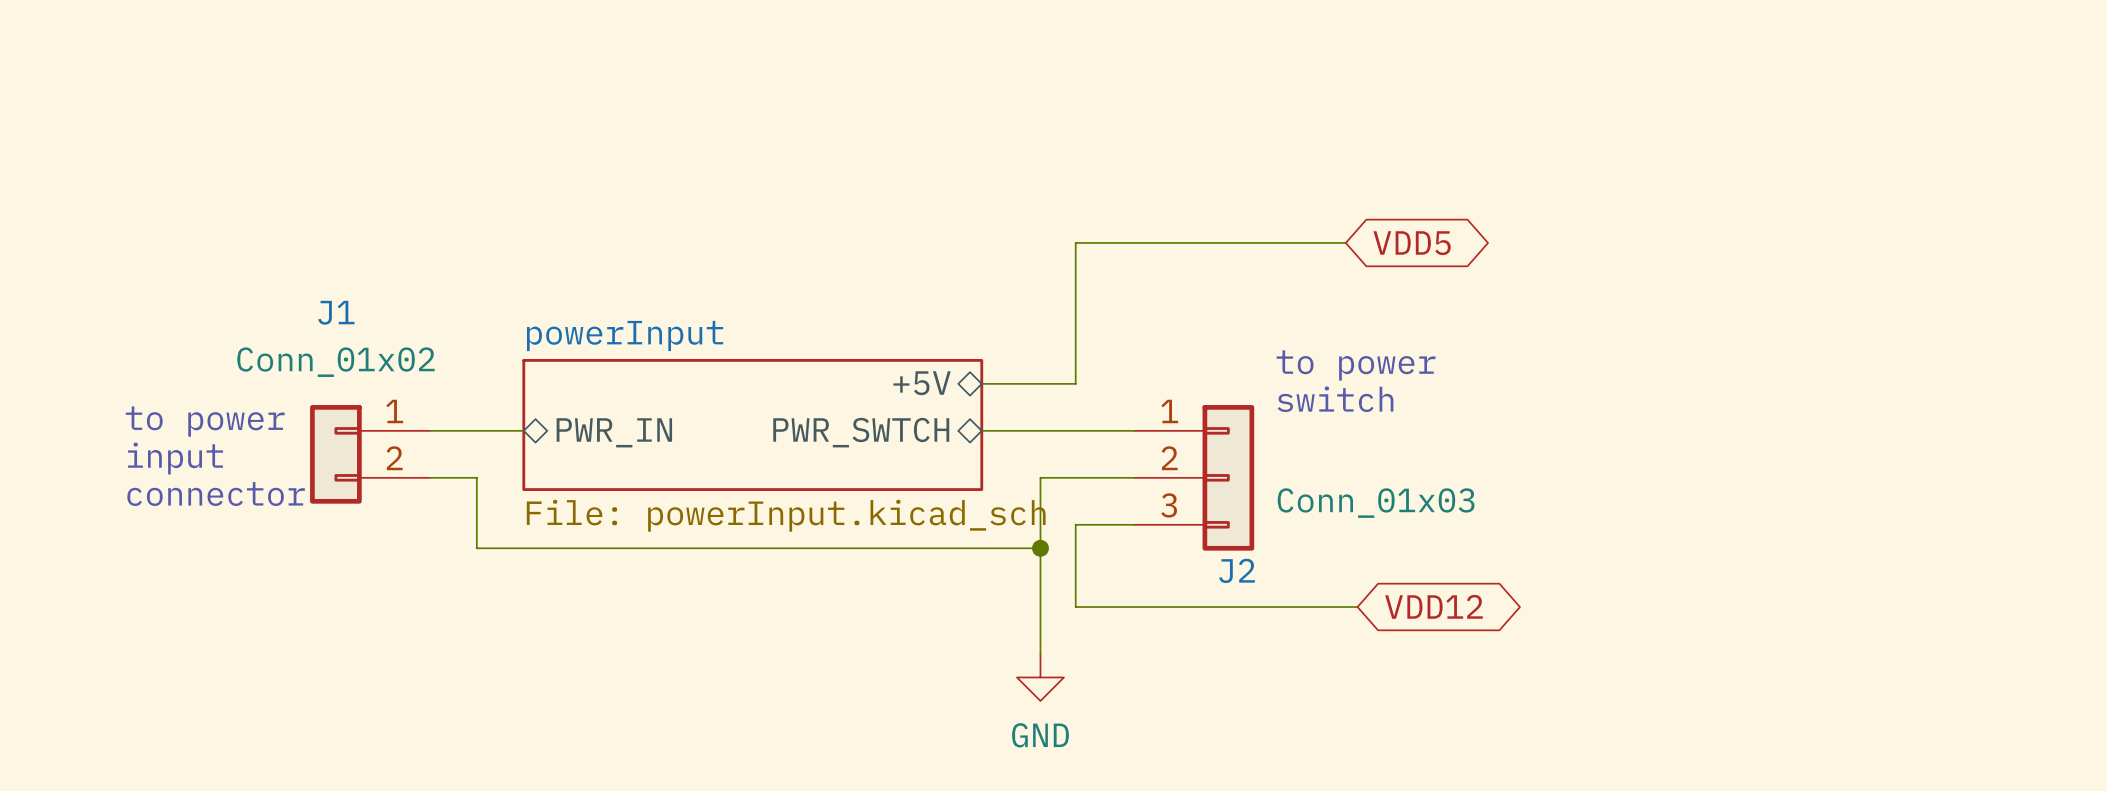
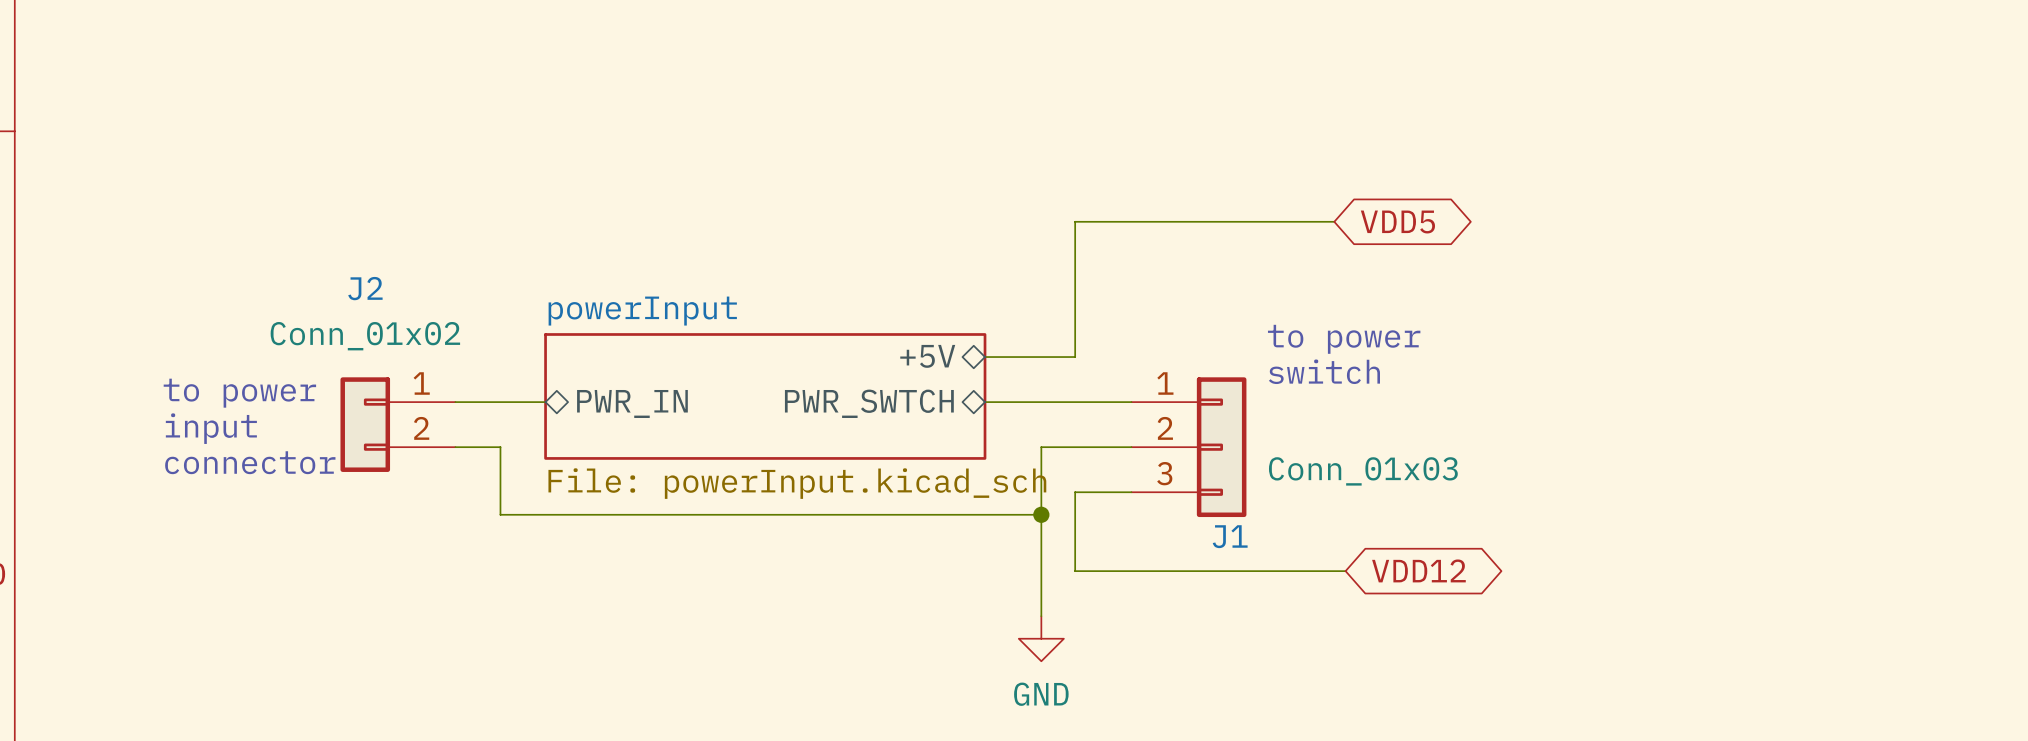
J1 name: J1 (336, 312) -> J2 (365, 288)
J2 name: J2 (1237, 570) -> J1 (1230, 536)

